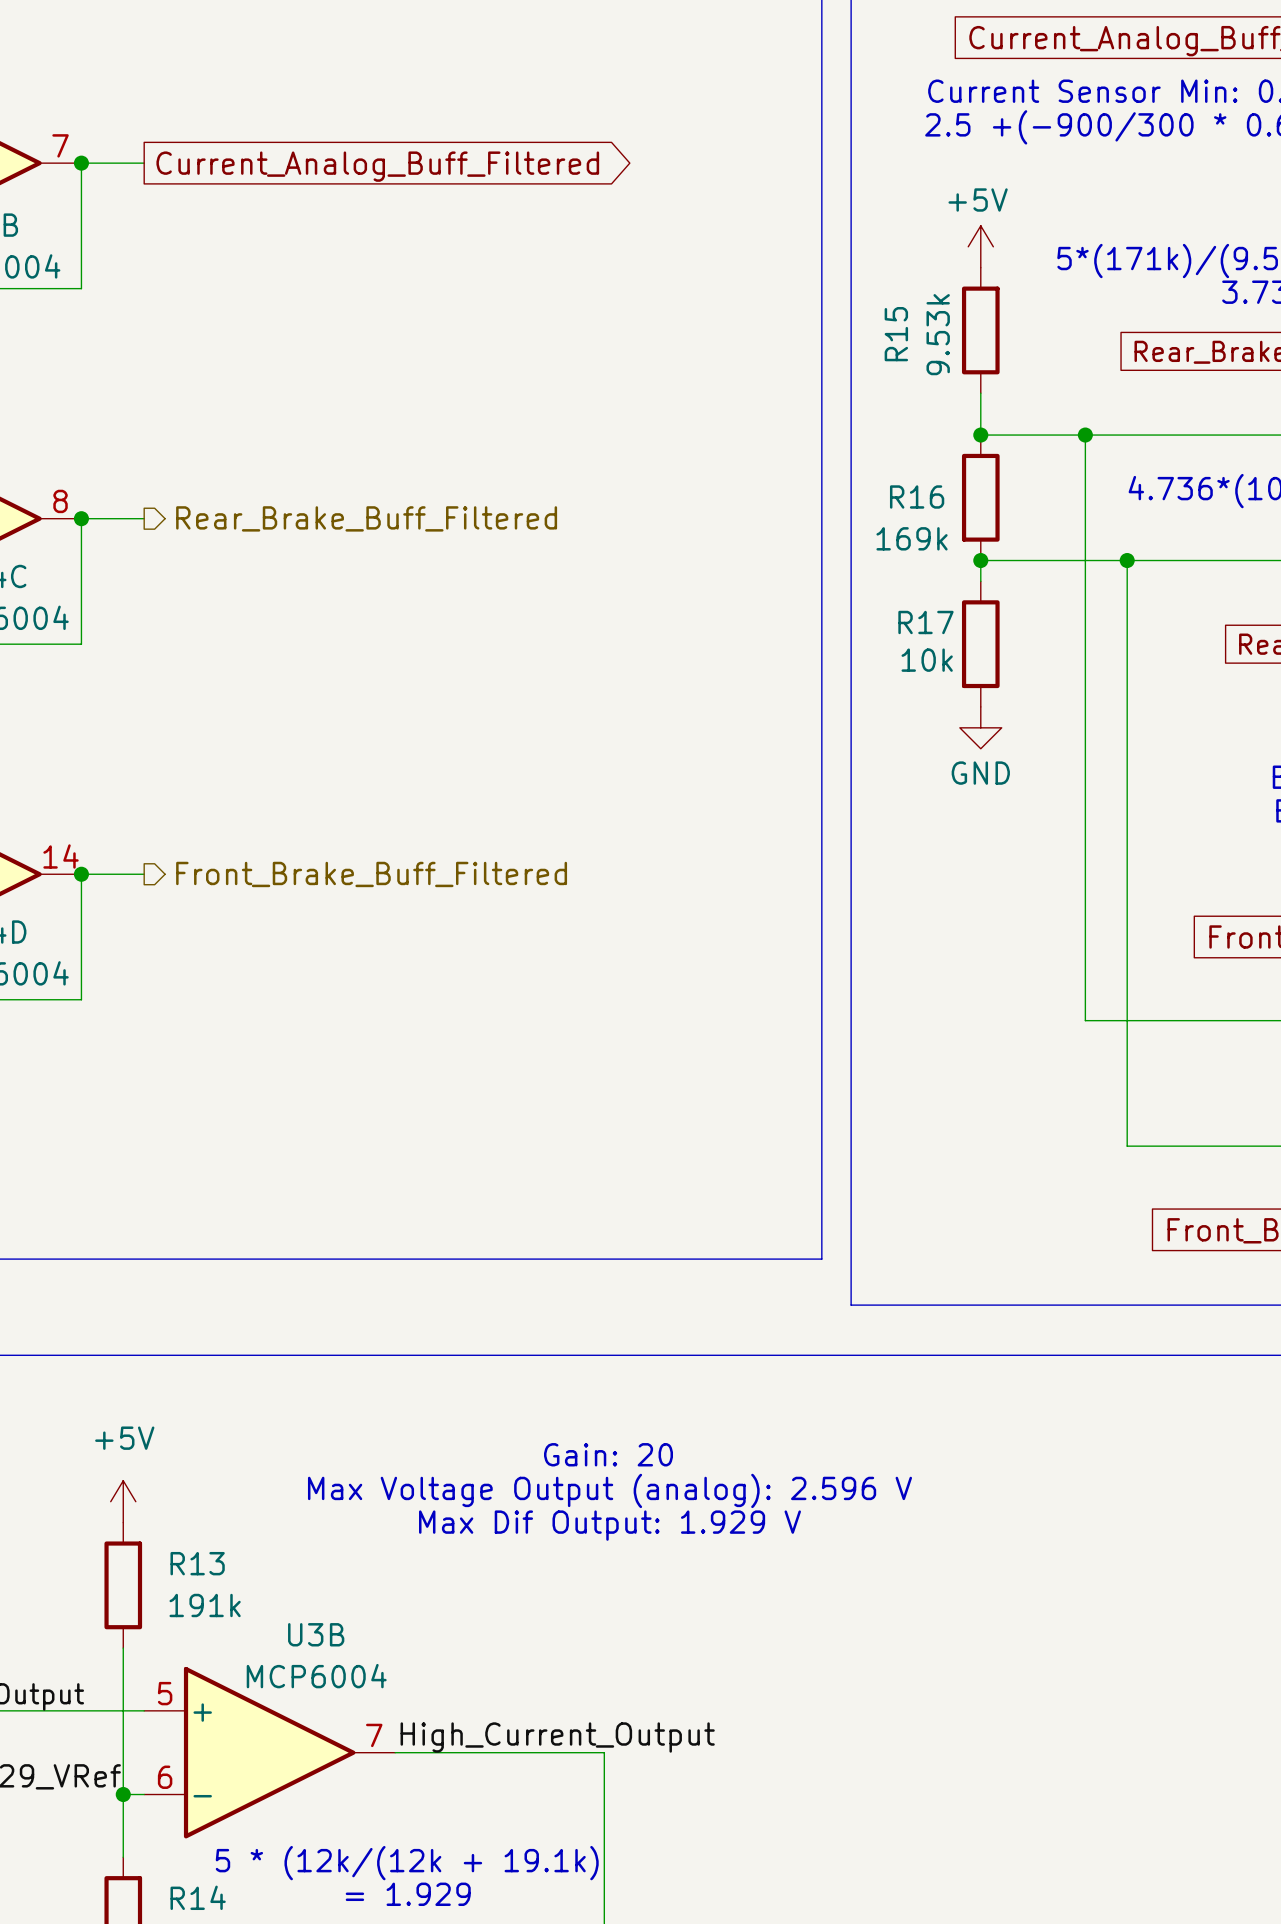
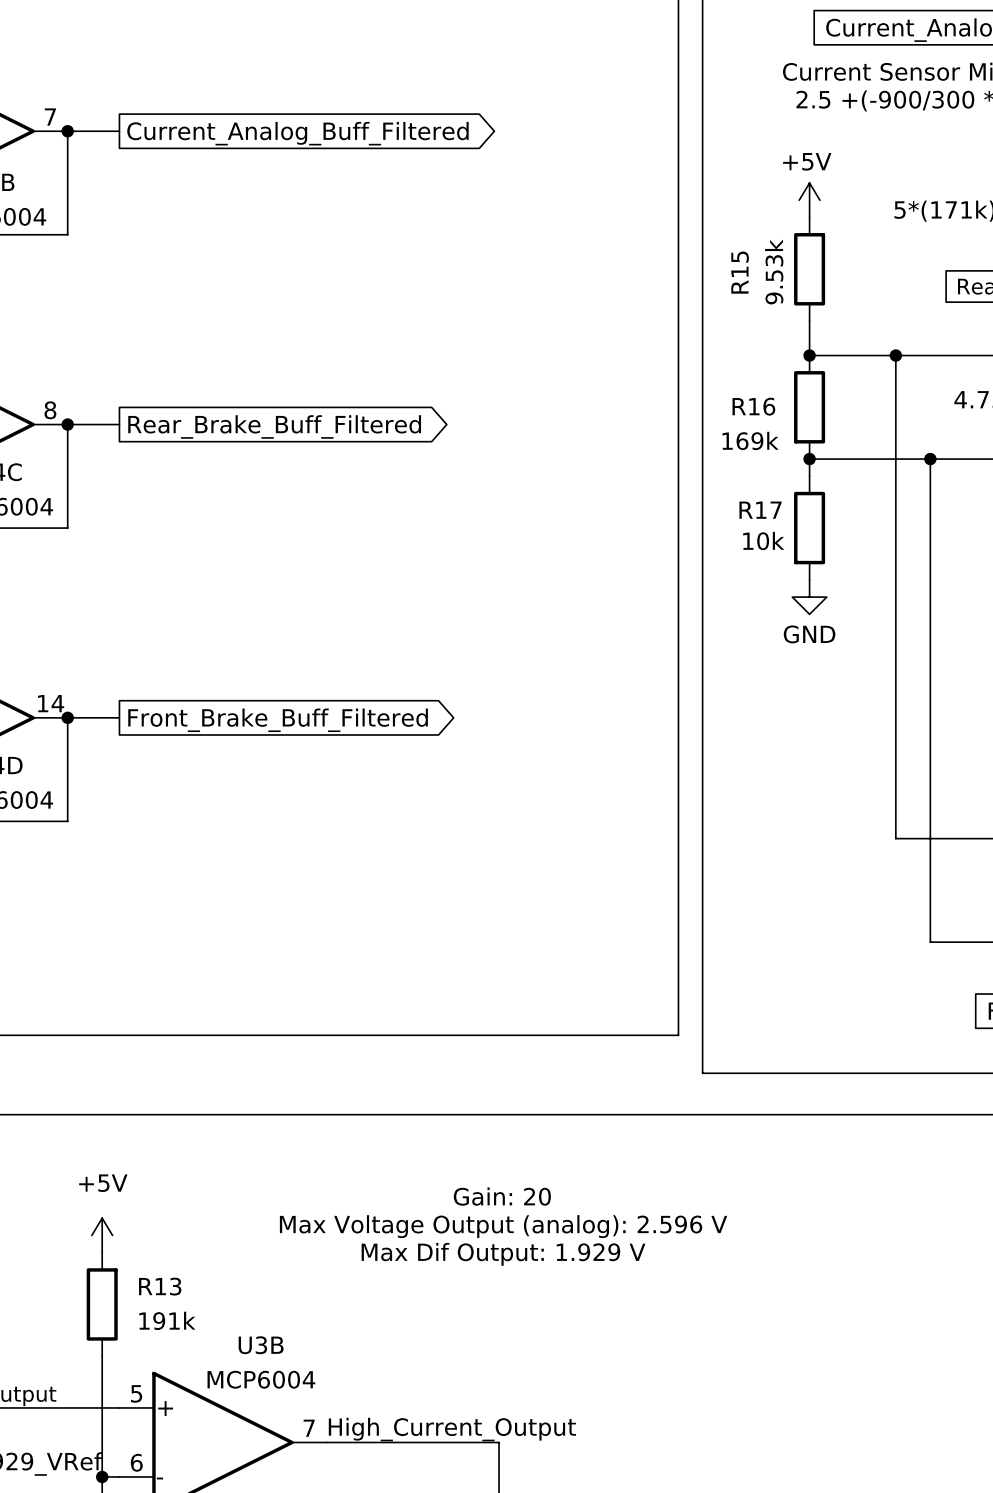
hierarchical label: Rear_Brake_Buff_Filtered (366, 518) -> none
global label: none -> Rear_Brake_Buff_Filtered (274, 426)
hierarchical label: Front_Brake_Buff_Filtered (371, 874) -> none
global label: none -> Front_Brake_Buff_Filtered (278, 720)

